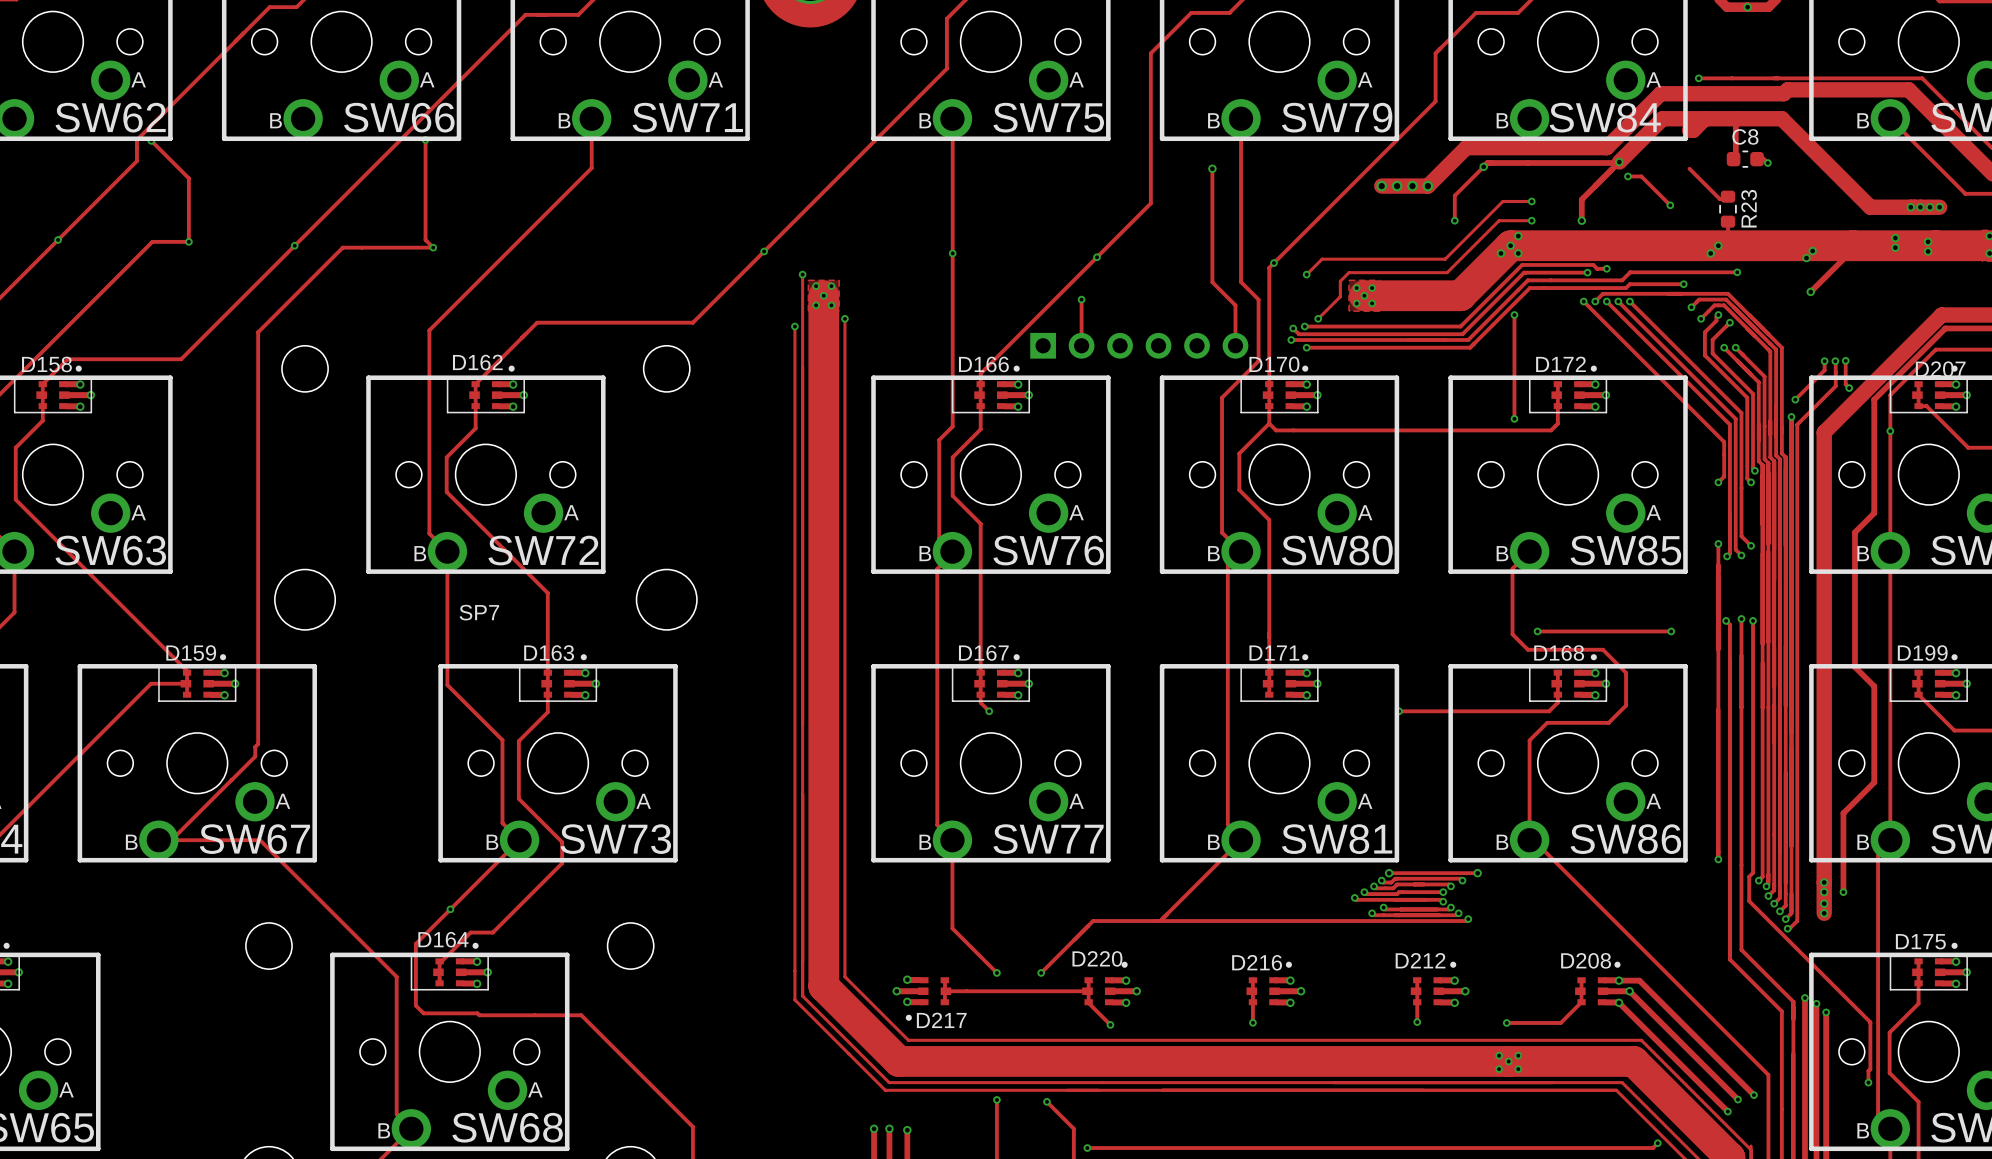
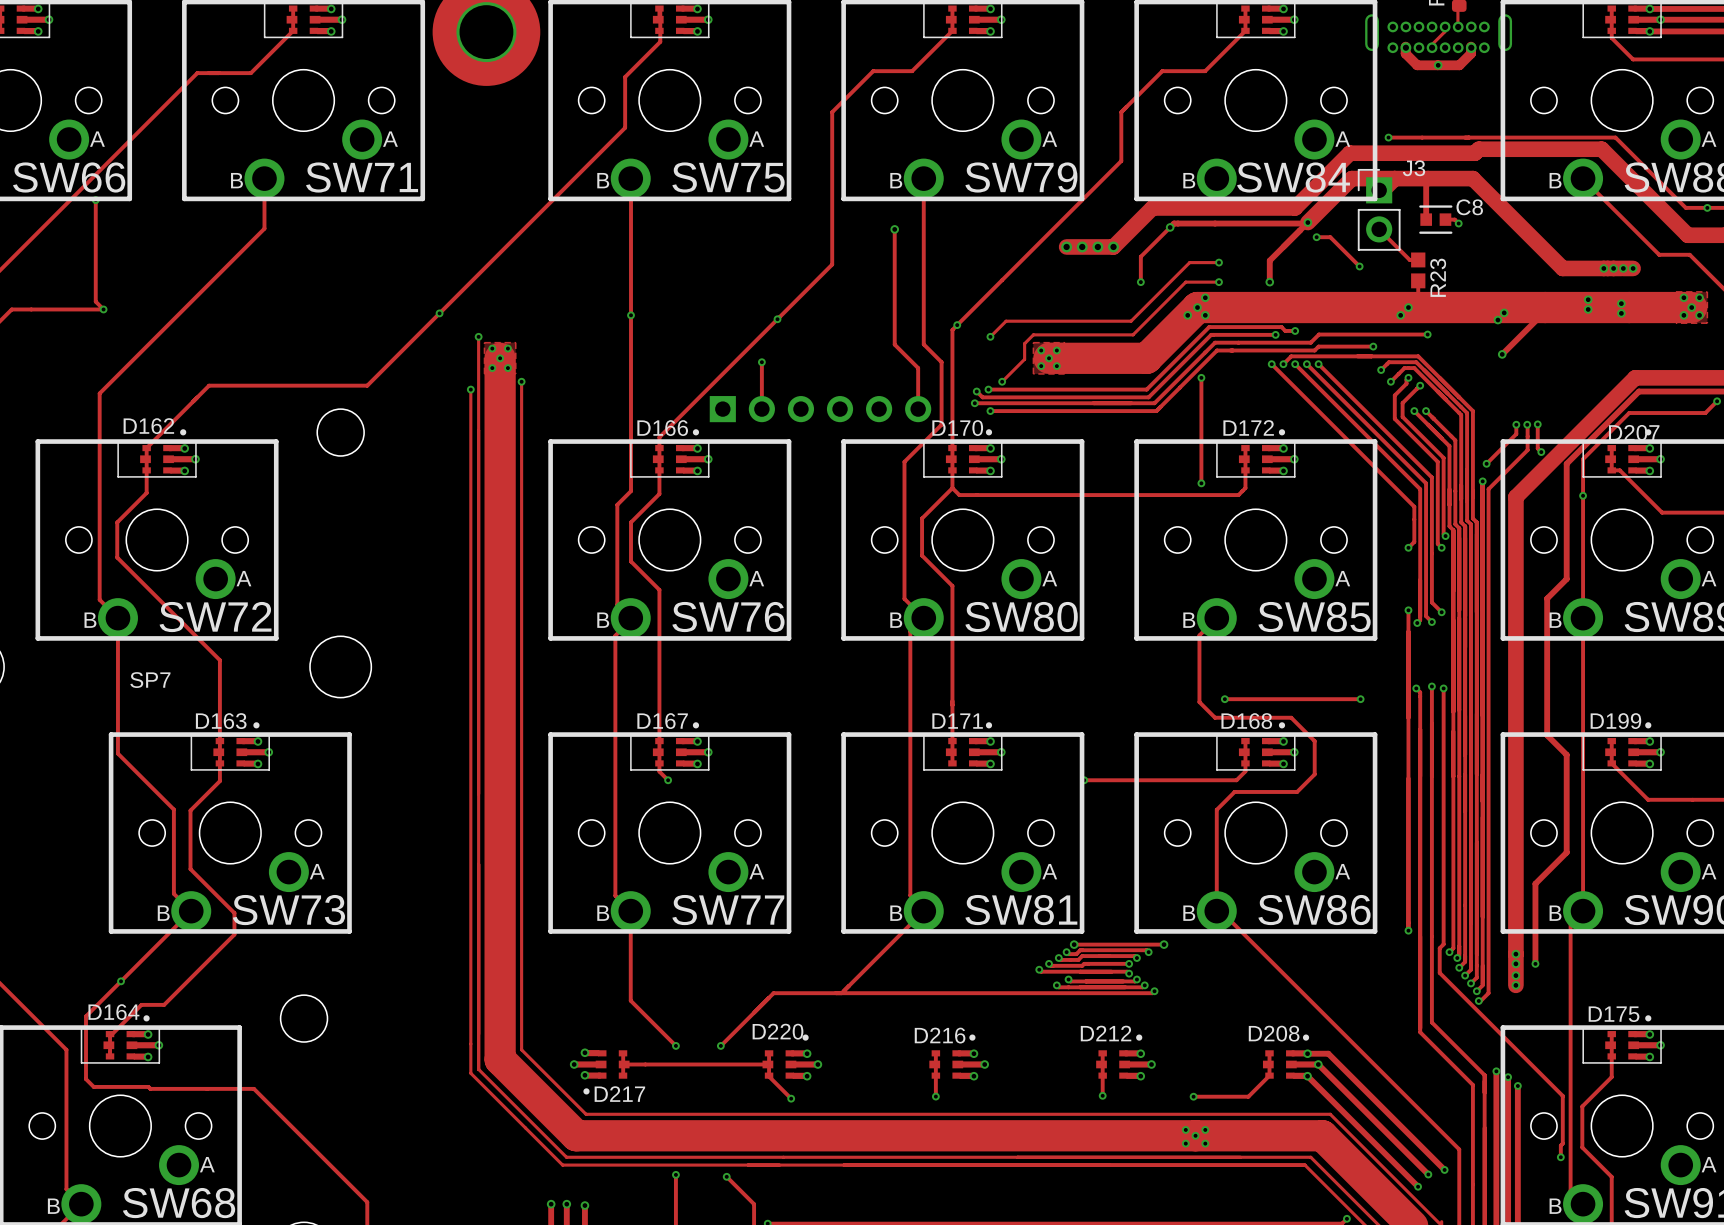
C8 name position: C8 (1745, 136) -> C8 (1469, 207)
J3: none -> (1379, 209)
C8 footprint: [1726, 150, 1764, 168] -> [1419, 205, 1453, 234]
R23 footprint: [1719, 190, 1737, 228] -> [1411, 252, 1426, 289]

